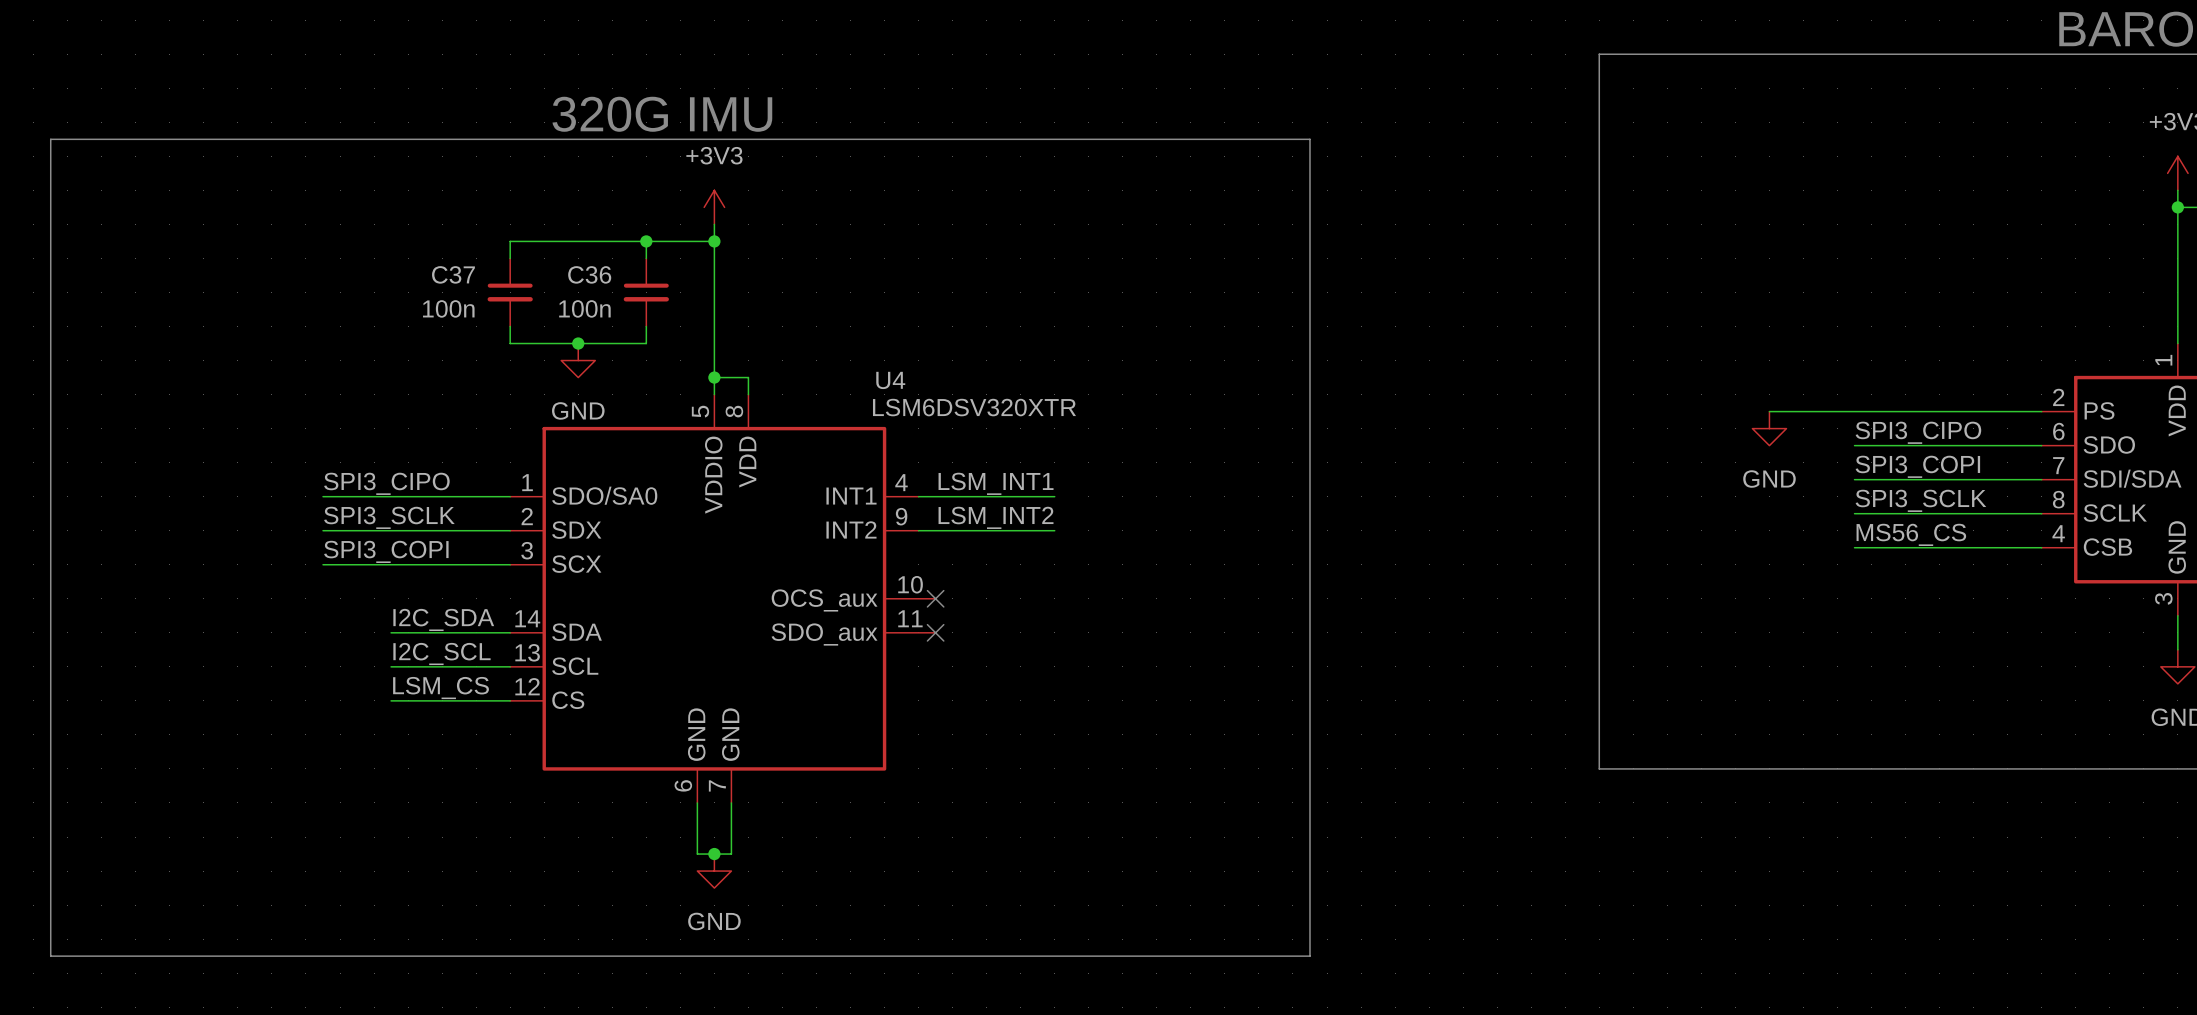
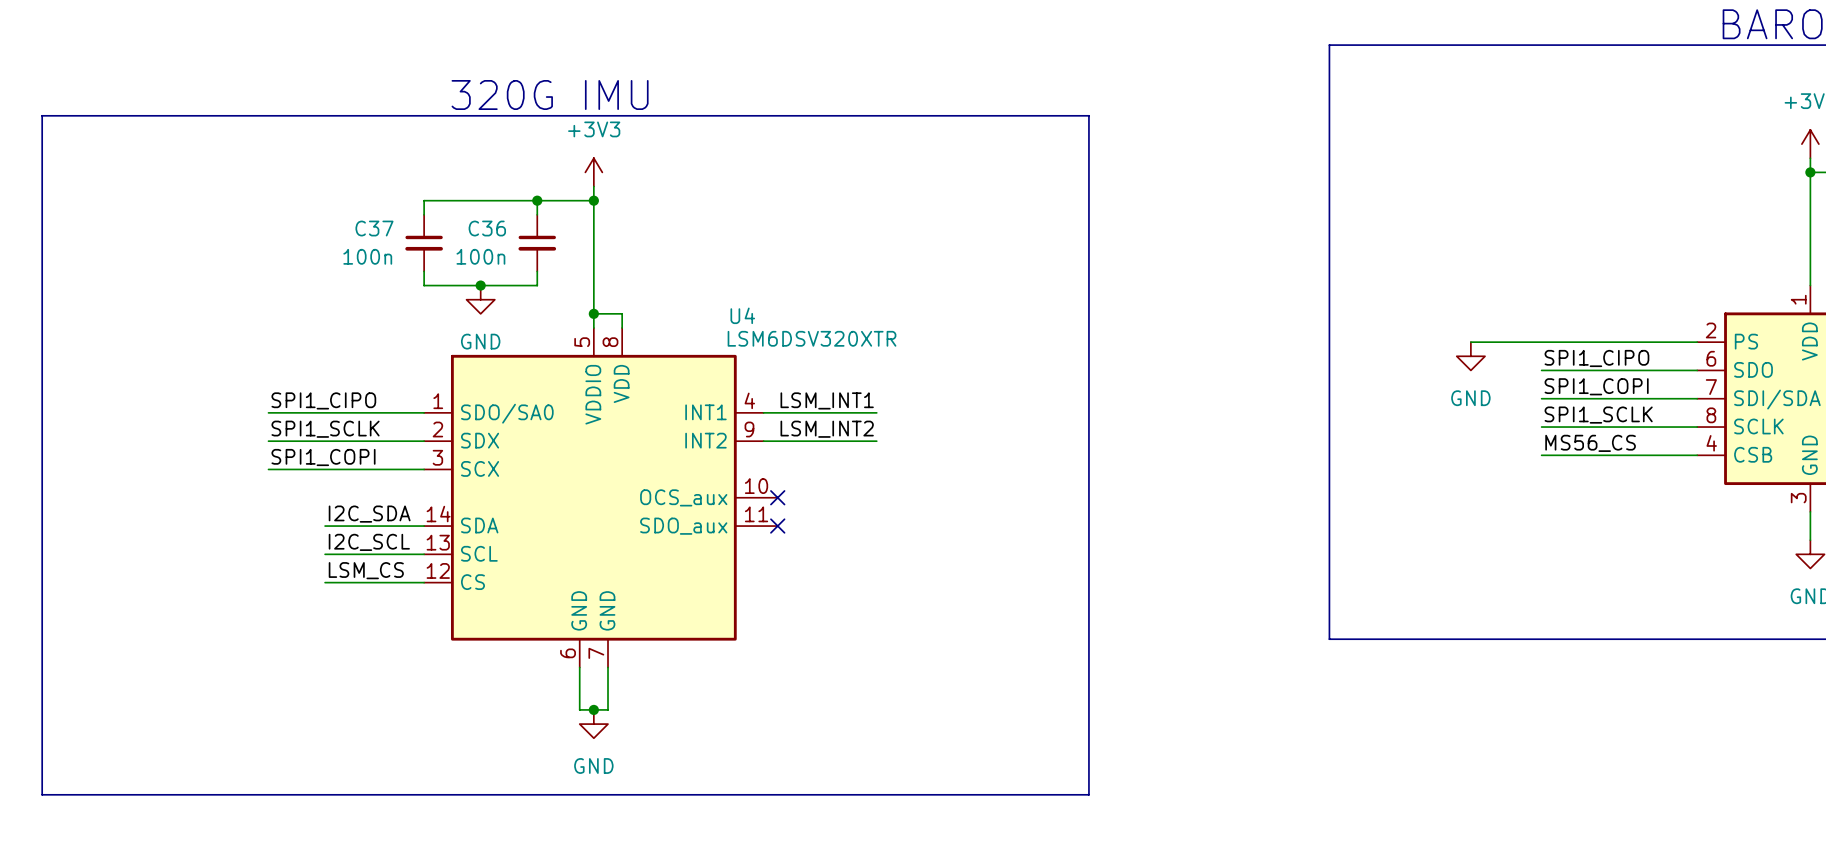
label: SPI3_CIPO (1918, 432) -> SPI1_CIPO (1596, 358)
label: SPI3_COPI (1917, 466) -> SPI1_COPI (1596, 386)
label: SPI3_CIPO (386, 483) -> SPI1_CIPO (323, 400)
label: SPI3_SCLK (1920, 500) -> SPI1_SCLK (1598, 415)
label: SPI3_SCLK (389, 517) -> SPI1_SCLK (325, 429)
label: SPI3_COPI (386, 551) -> SPI1_COPI (323, 457)

